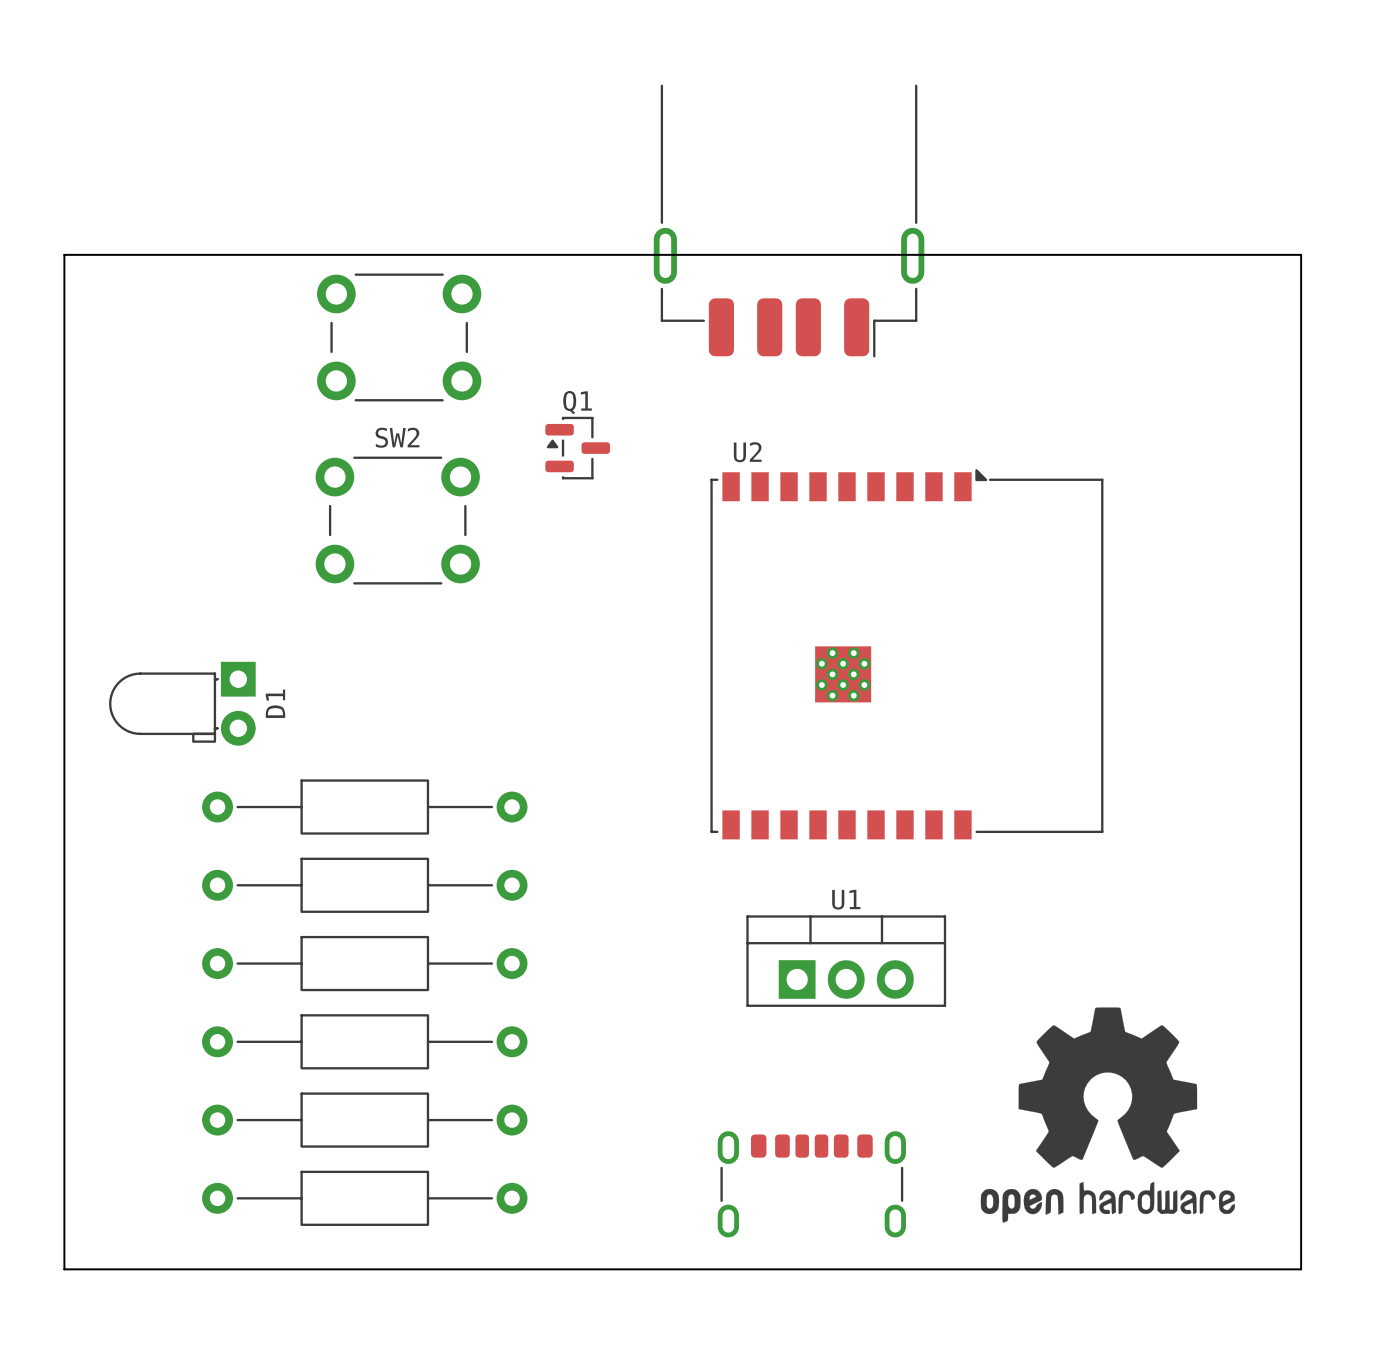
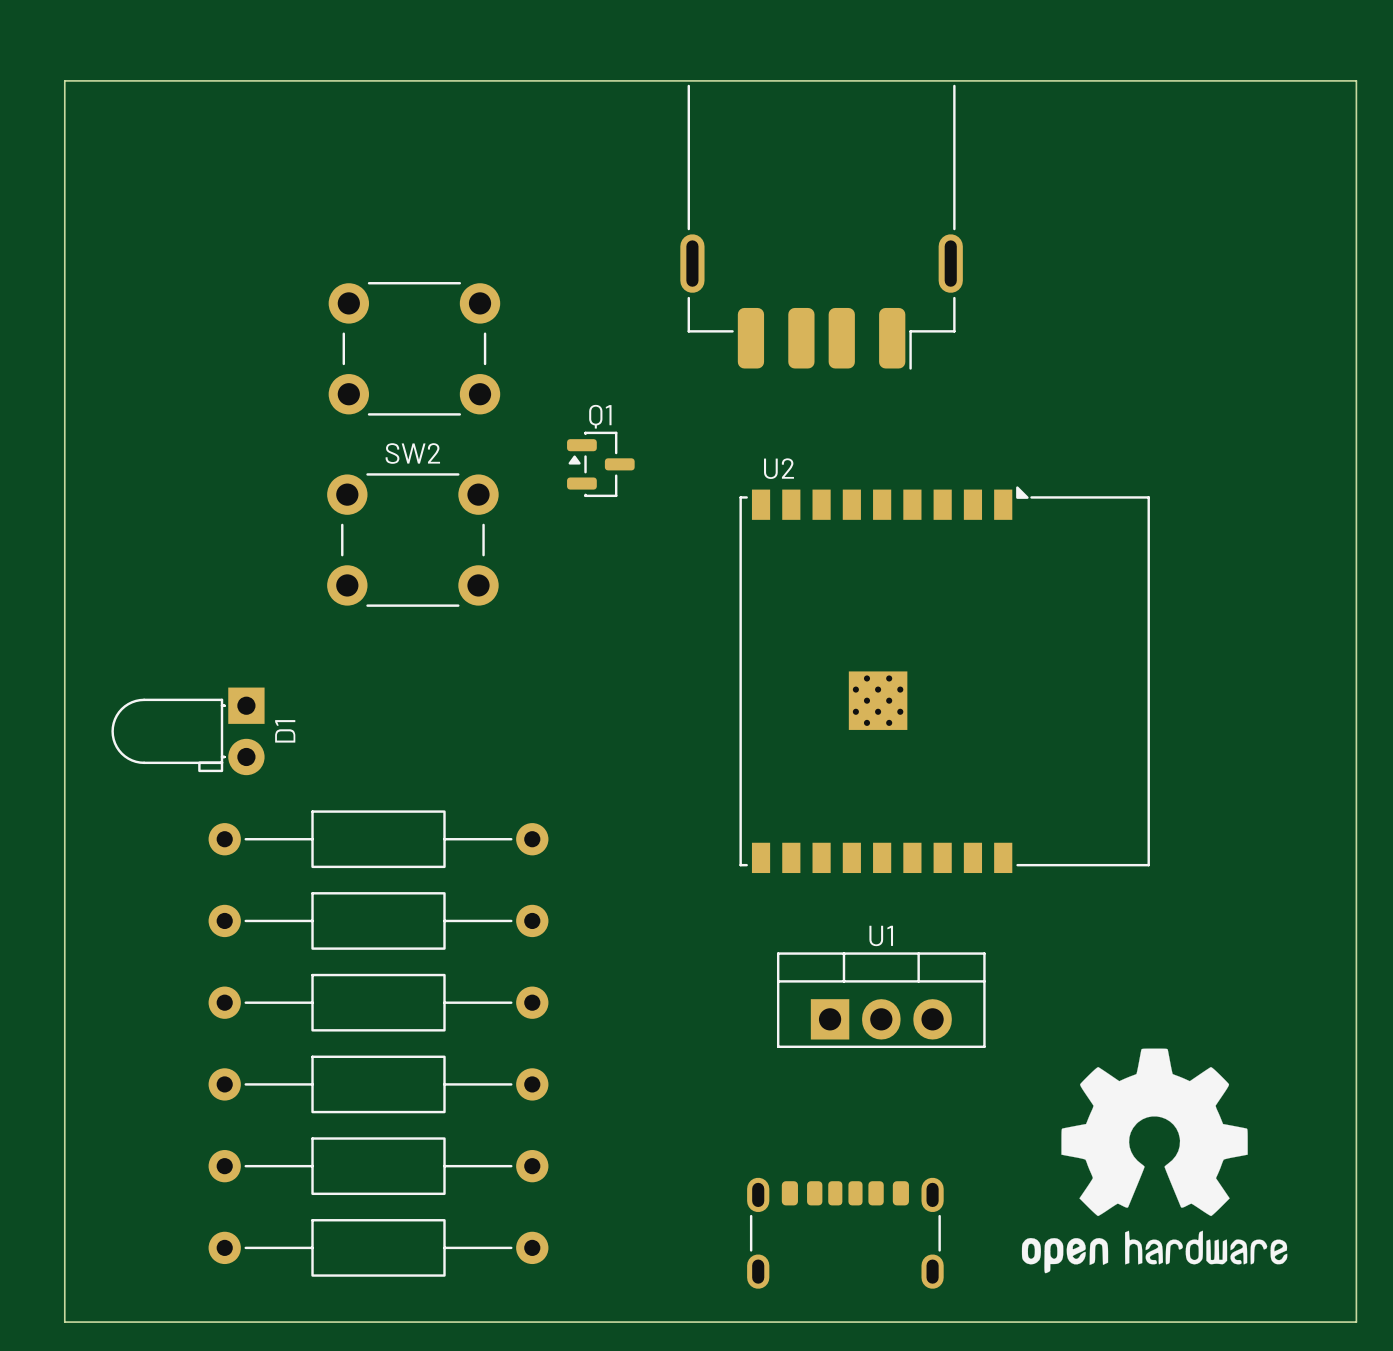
board edge: (64, 254) (1301, 254) -> (64, 262) (64, 80) (1356, 80) (1356, 262)

